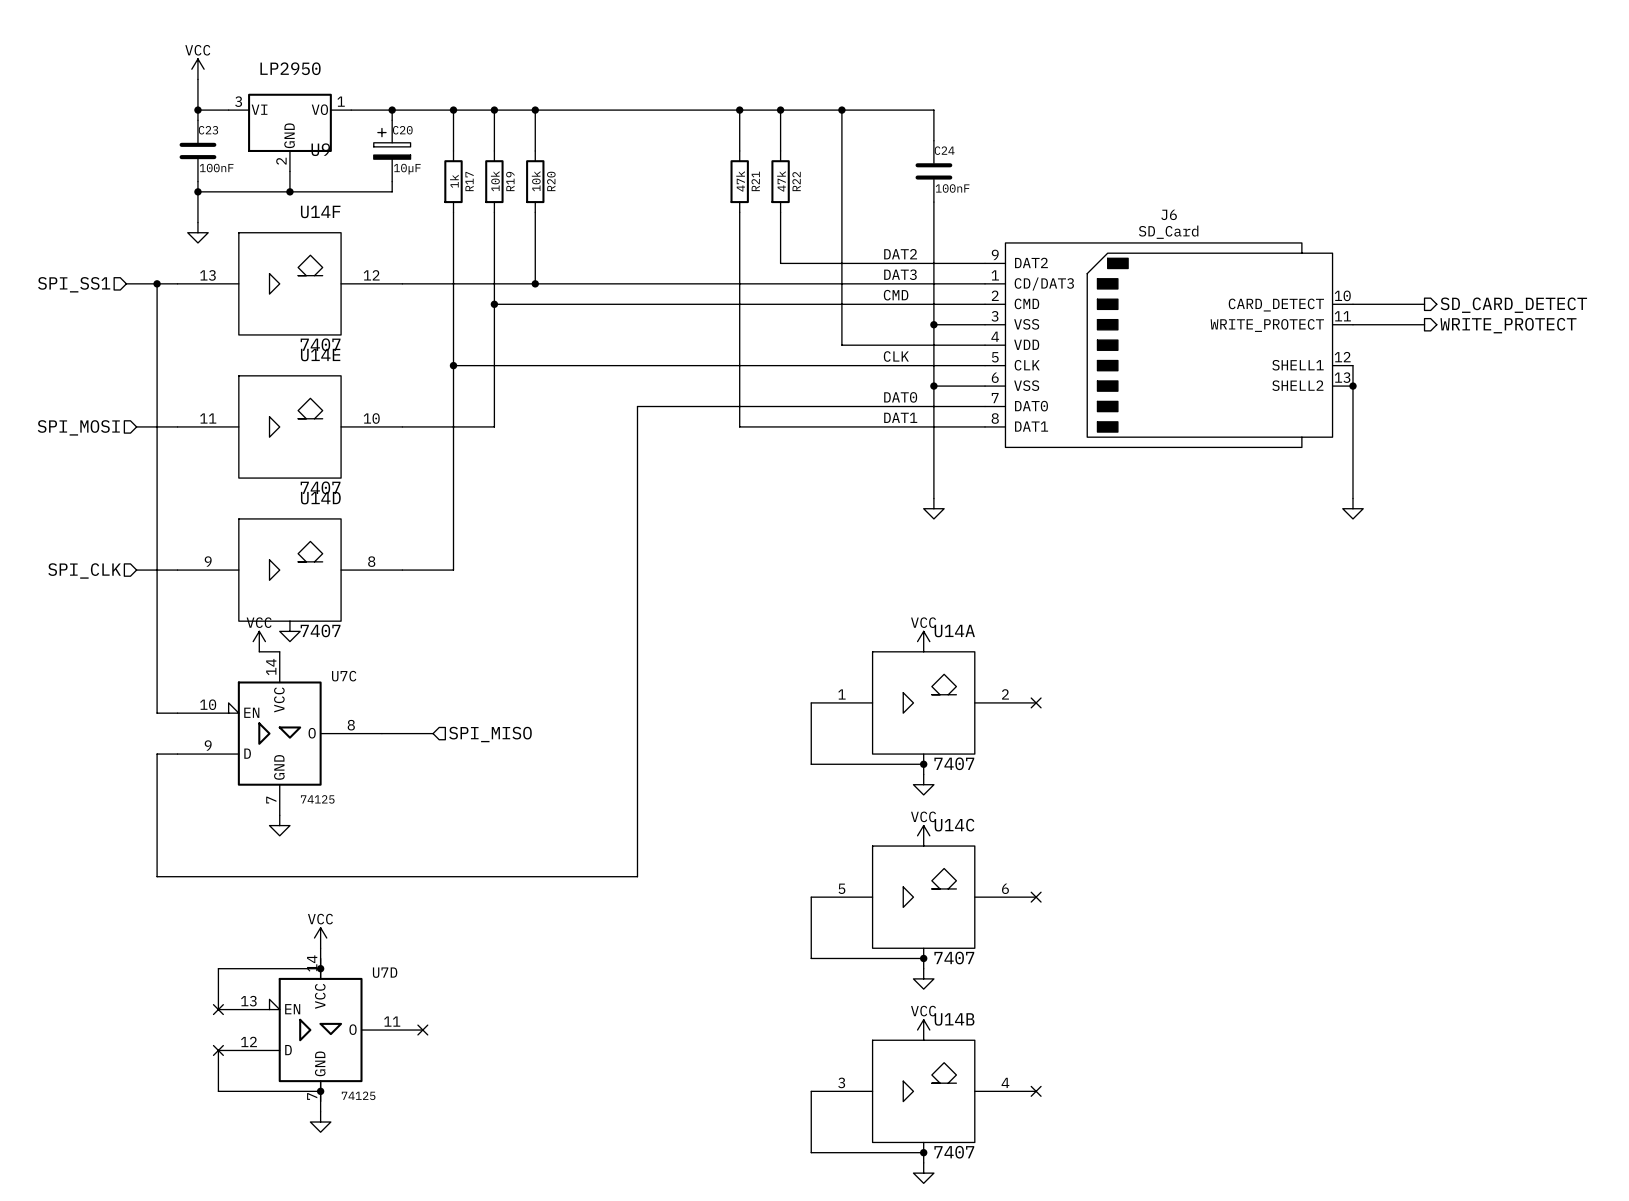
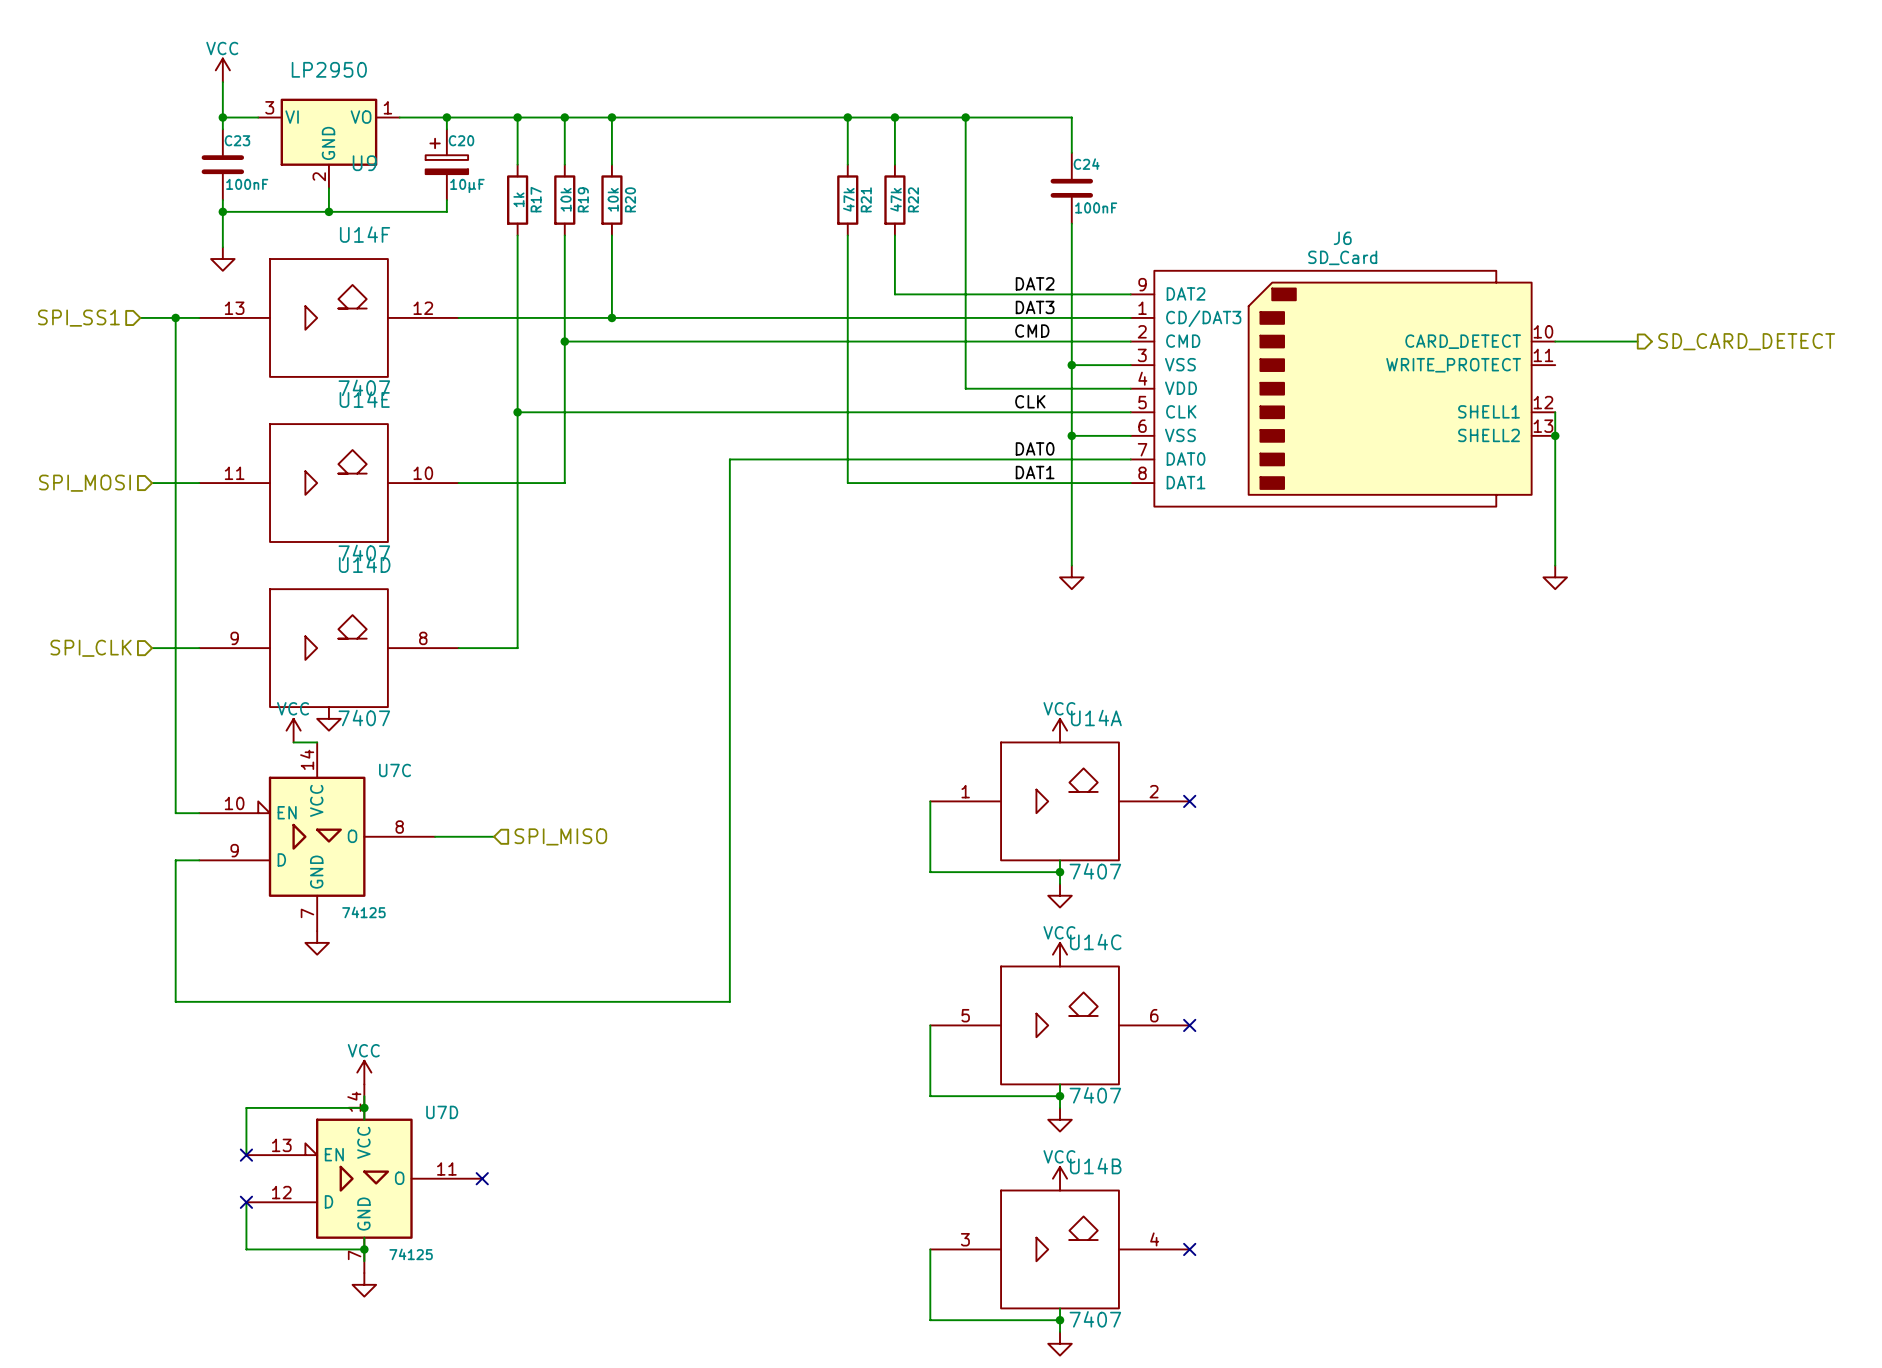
wire: (1352, 324) (1424, 324) -> none
hierarchical label: WRITE_PROTECT (1508, 325) -> none

